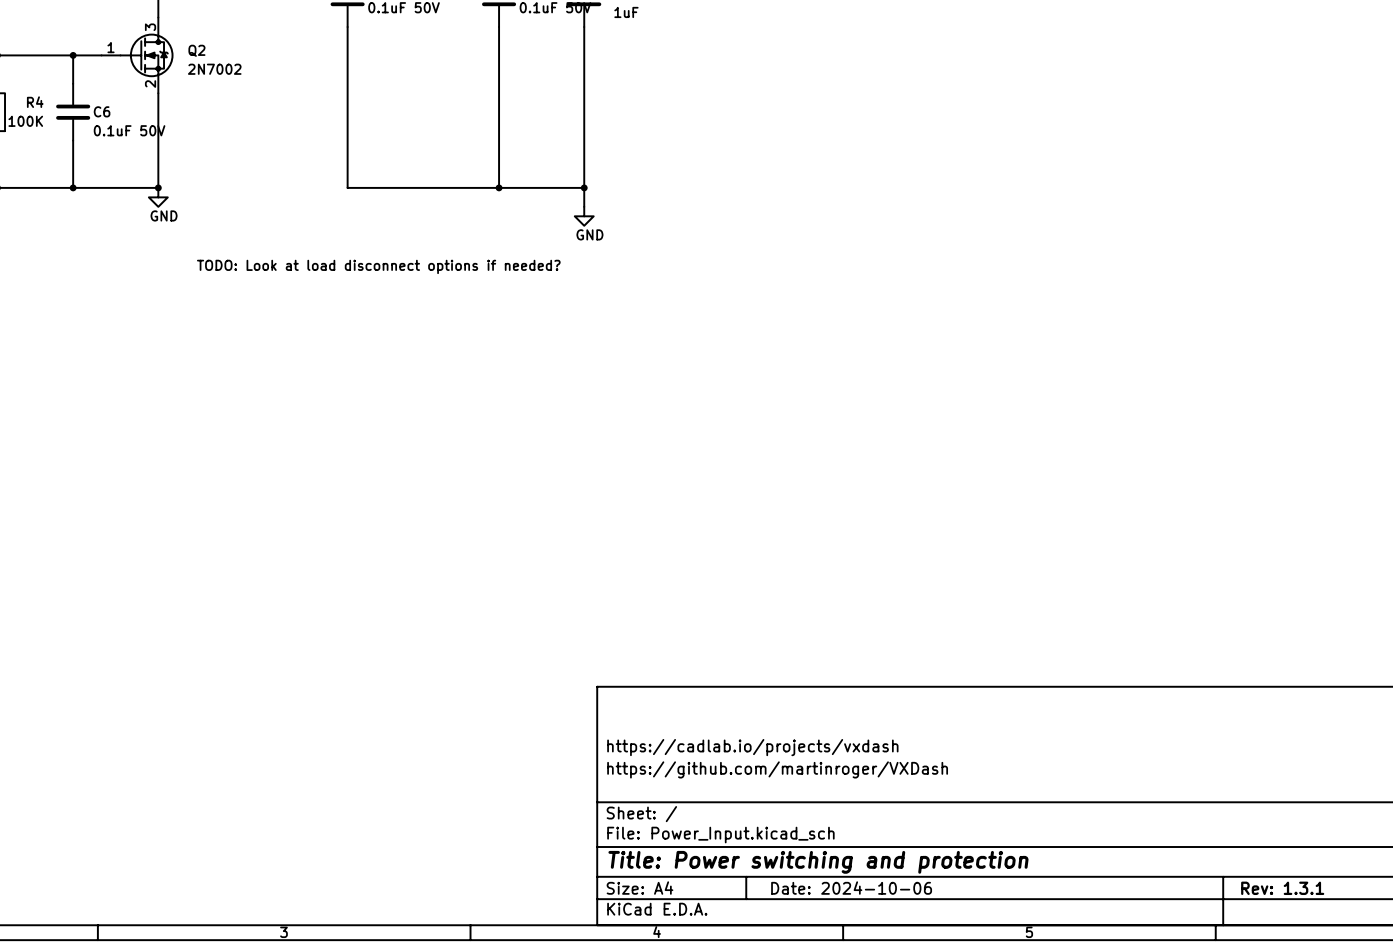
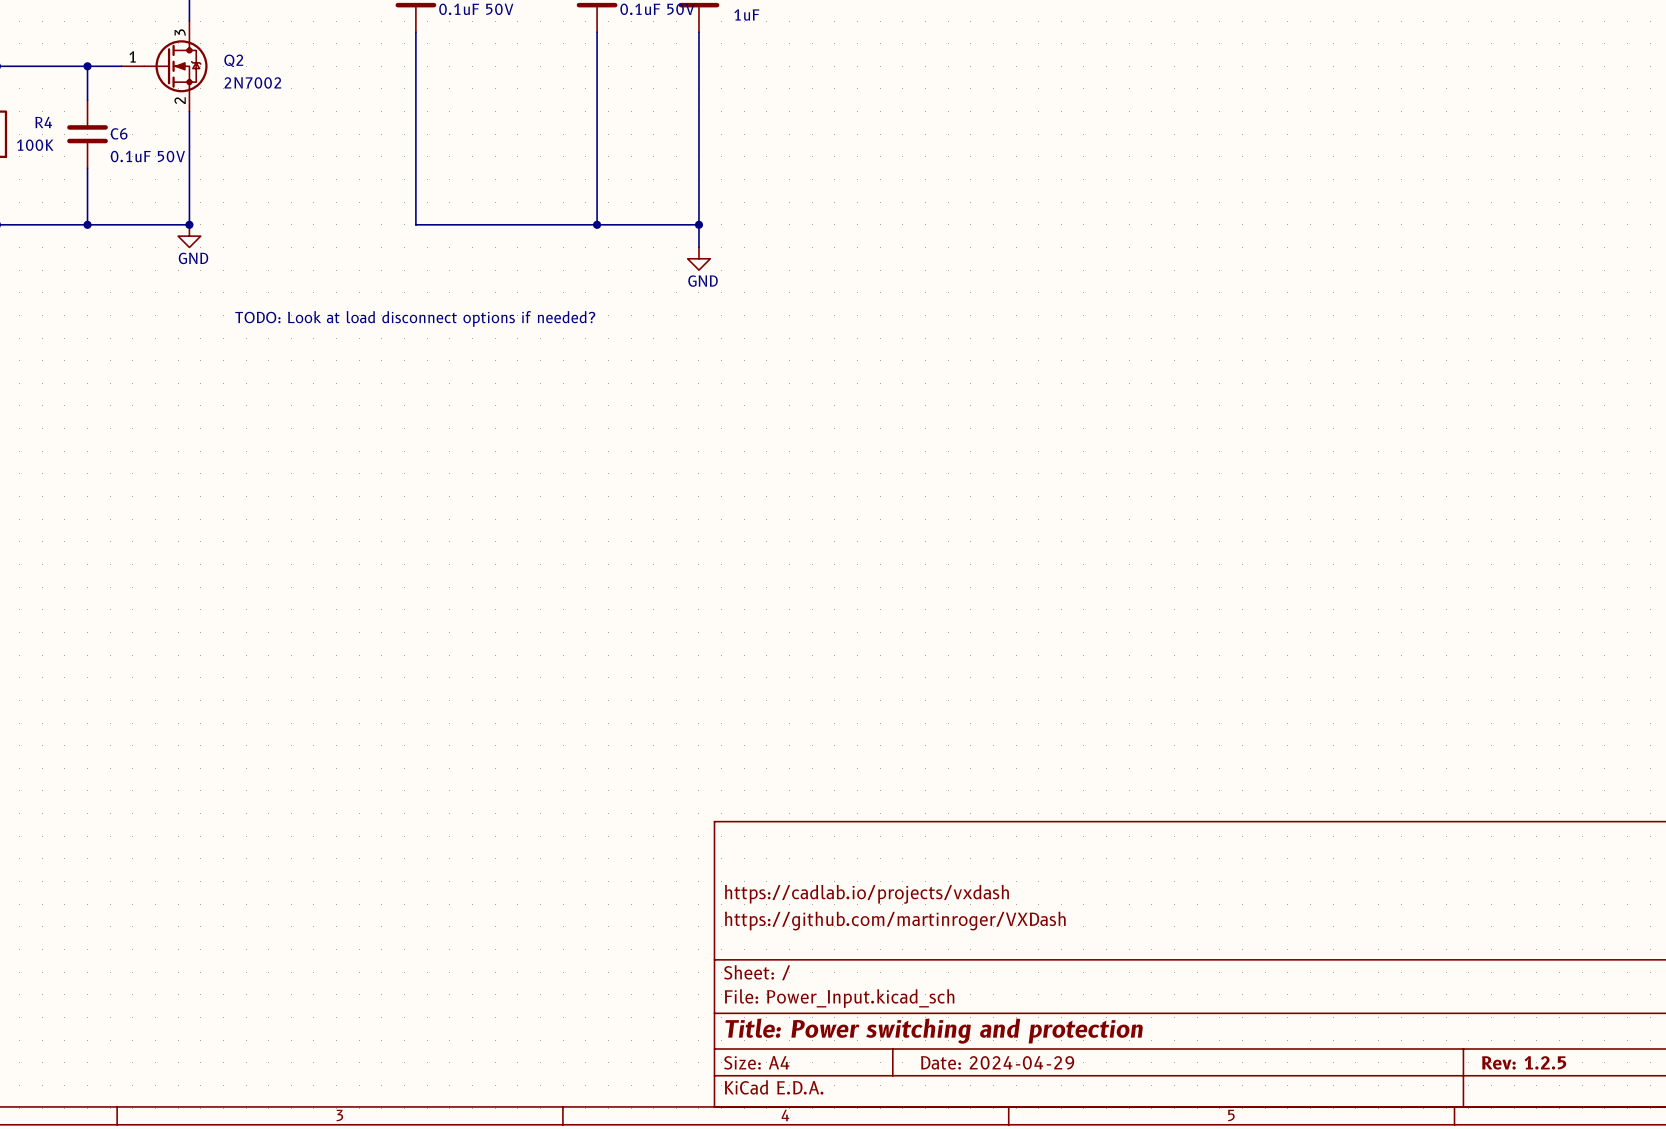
title block: Date: 2024-10-06 (851, 888) -> Date: 2024-04-29 (997, 1062)
title block: Rev: 1.3.1 (1282, 888) -> Rev: 1.2.5 (1524, 1062)

